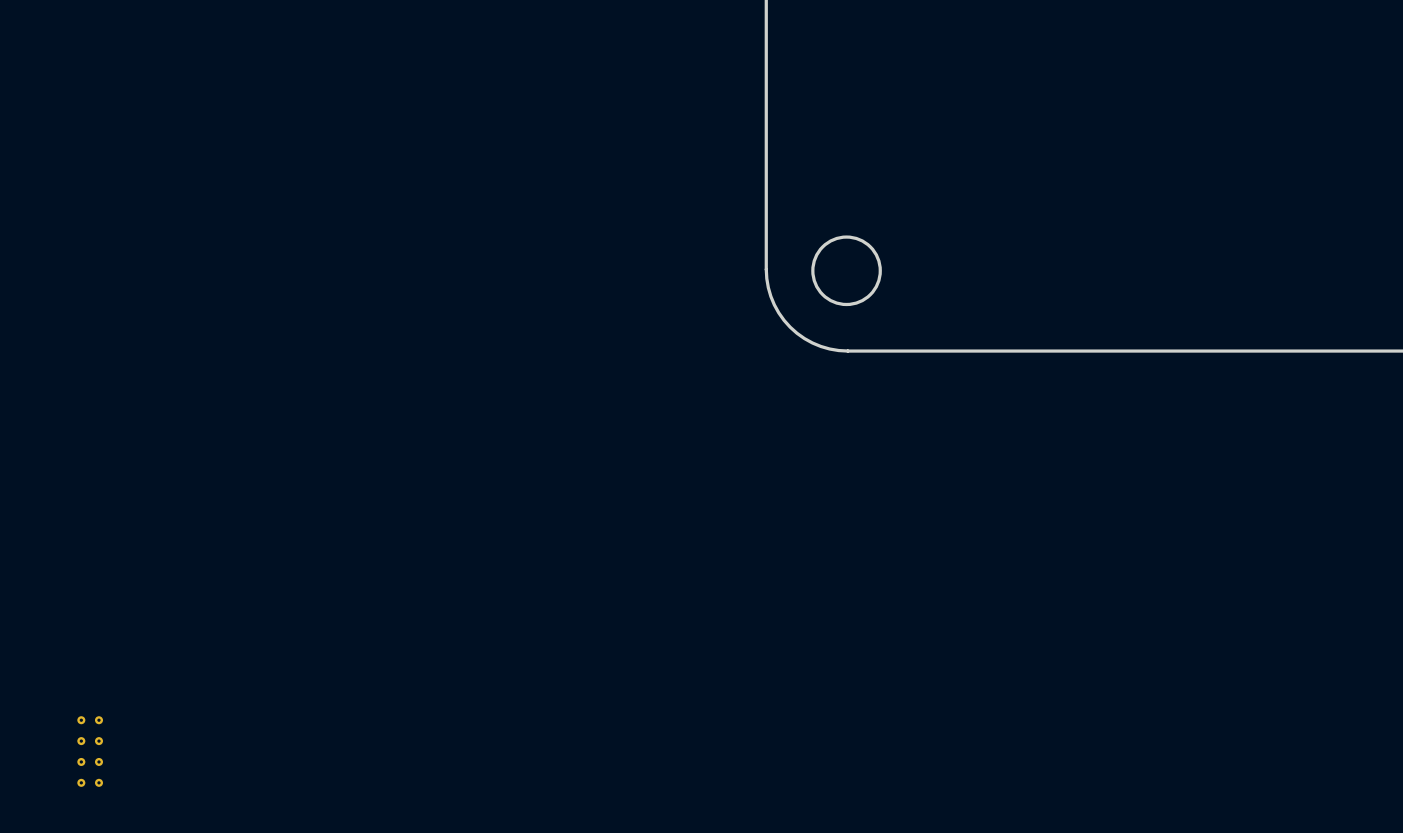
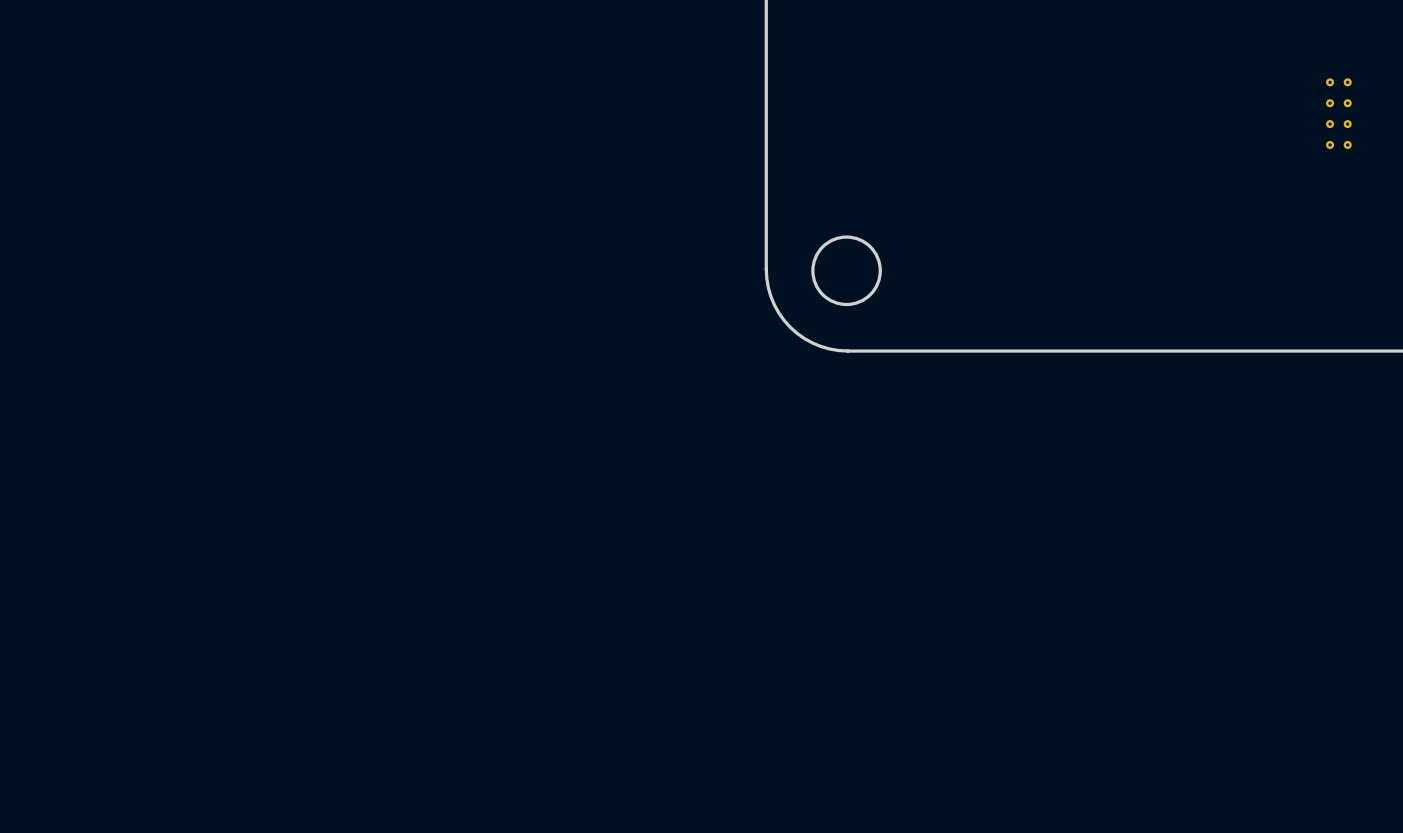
part: none -> (1338, 113)
part: (90, 751) -> none

